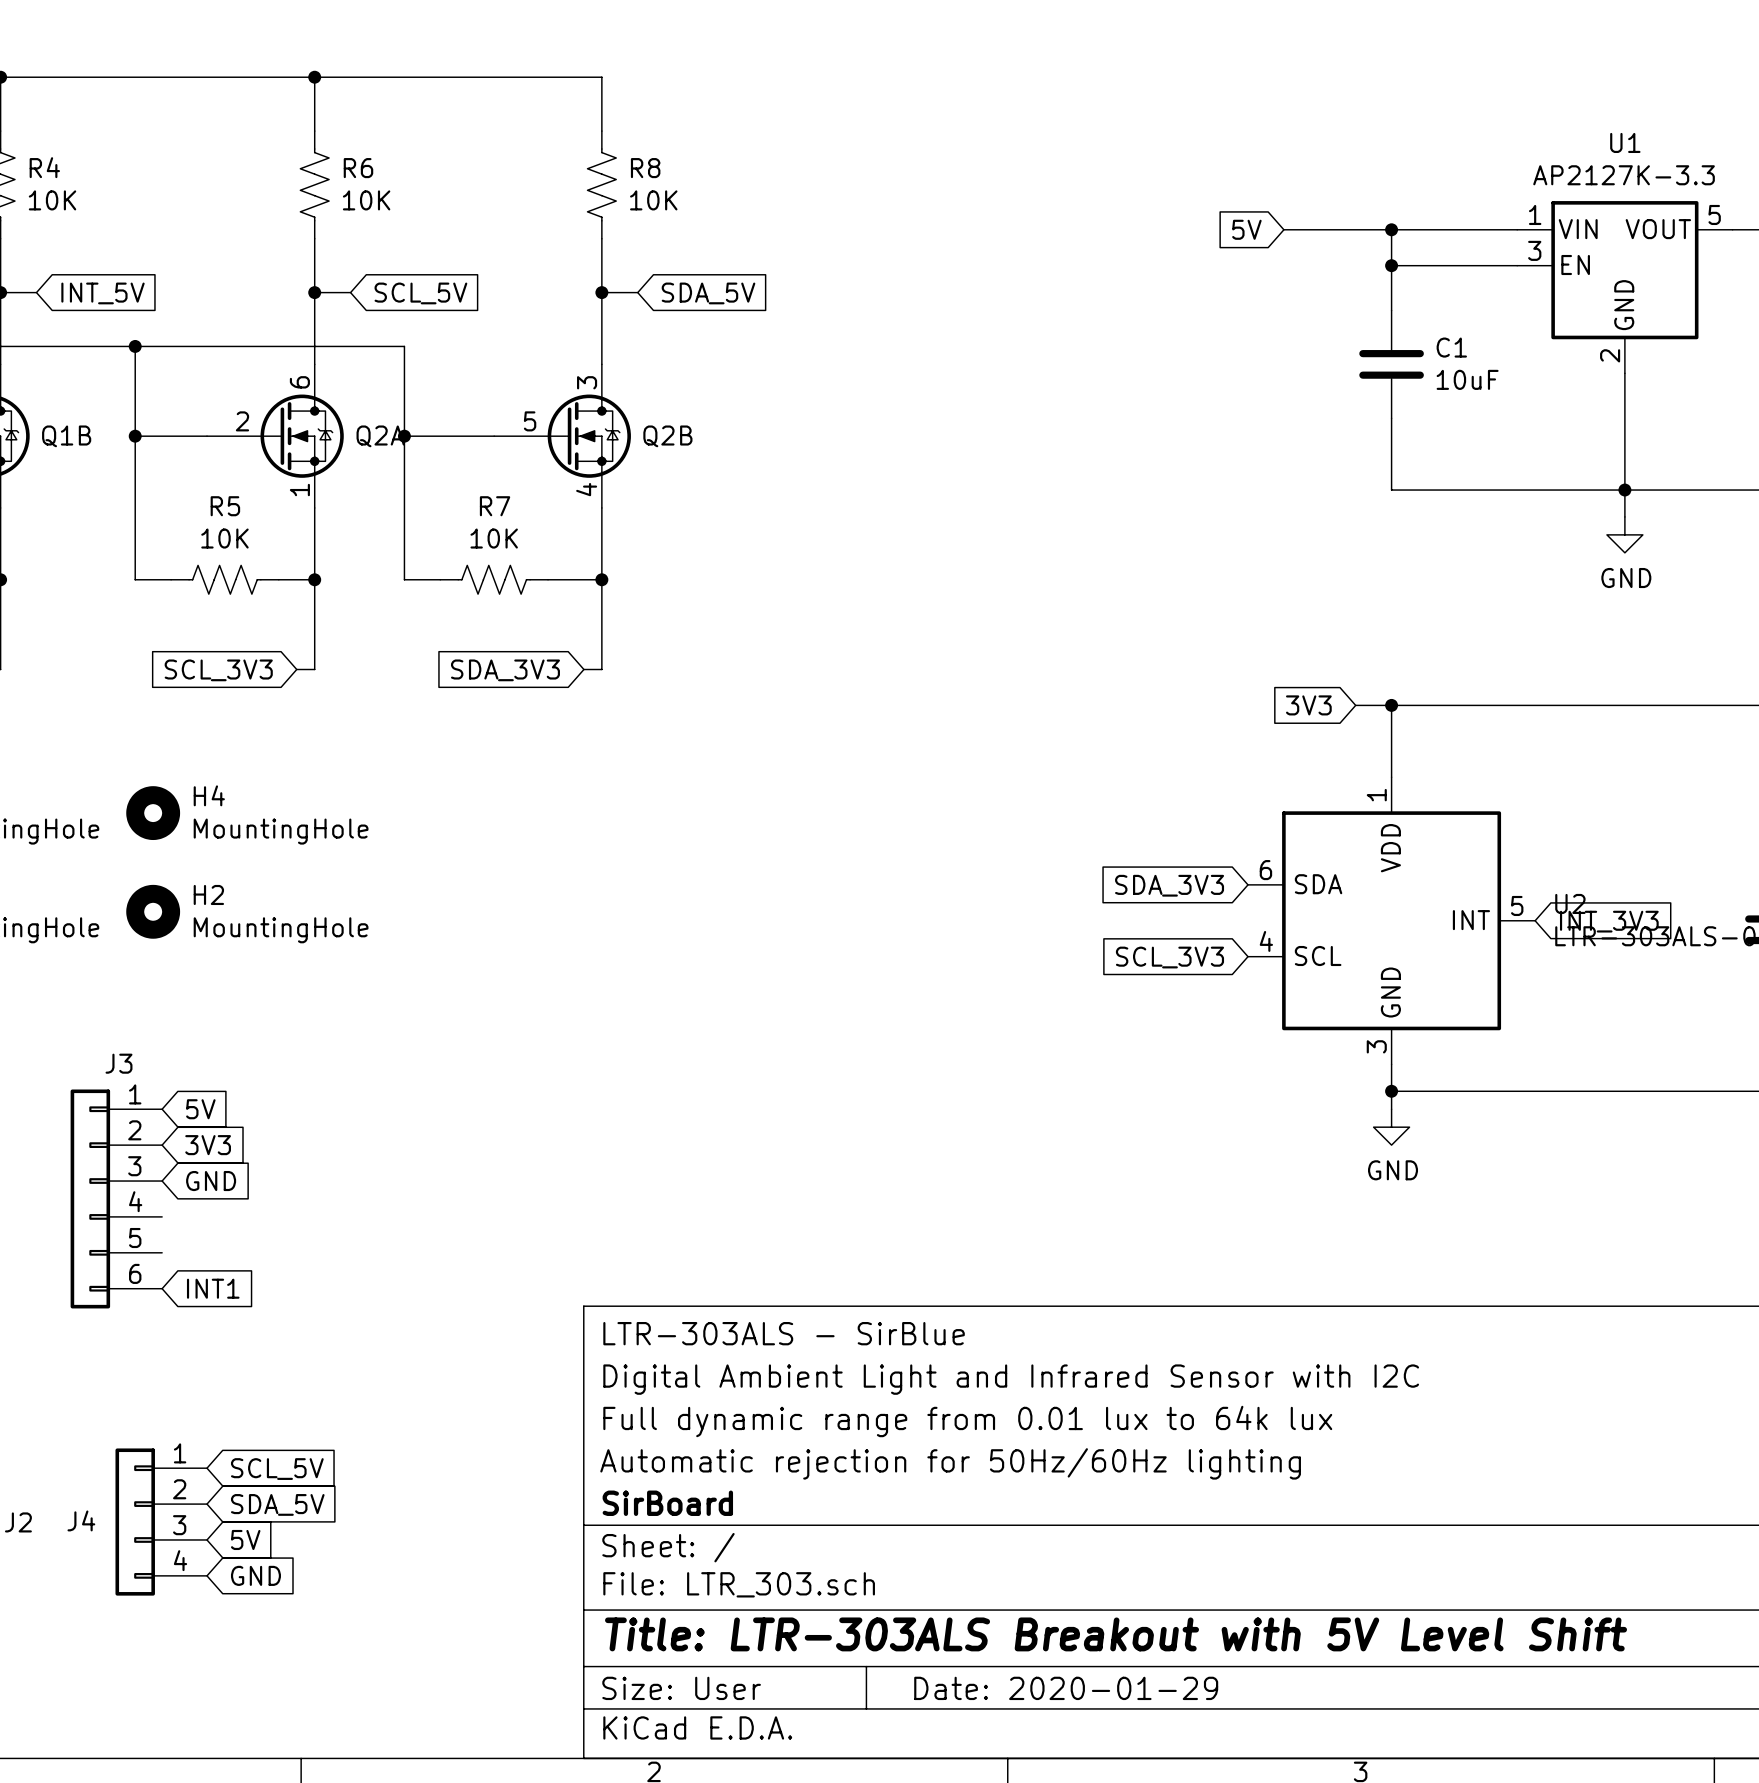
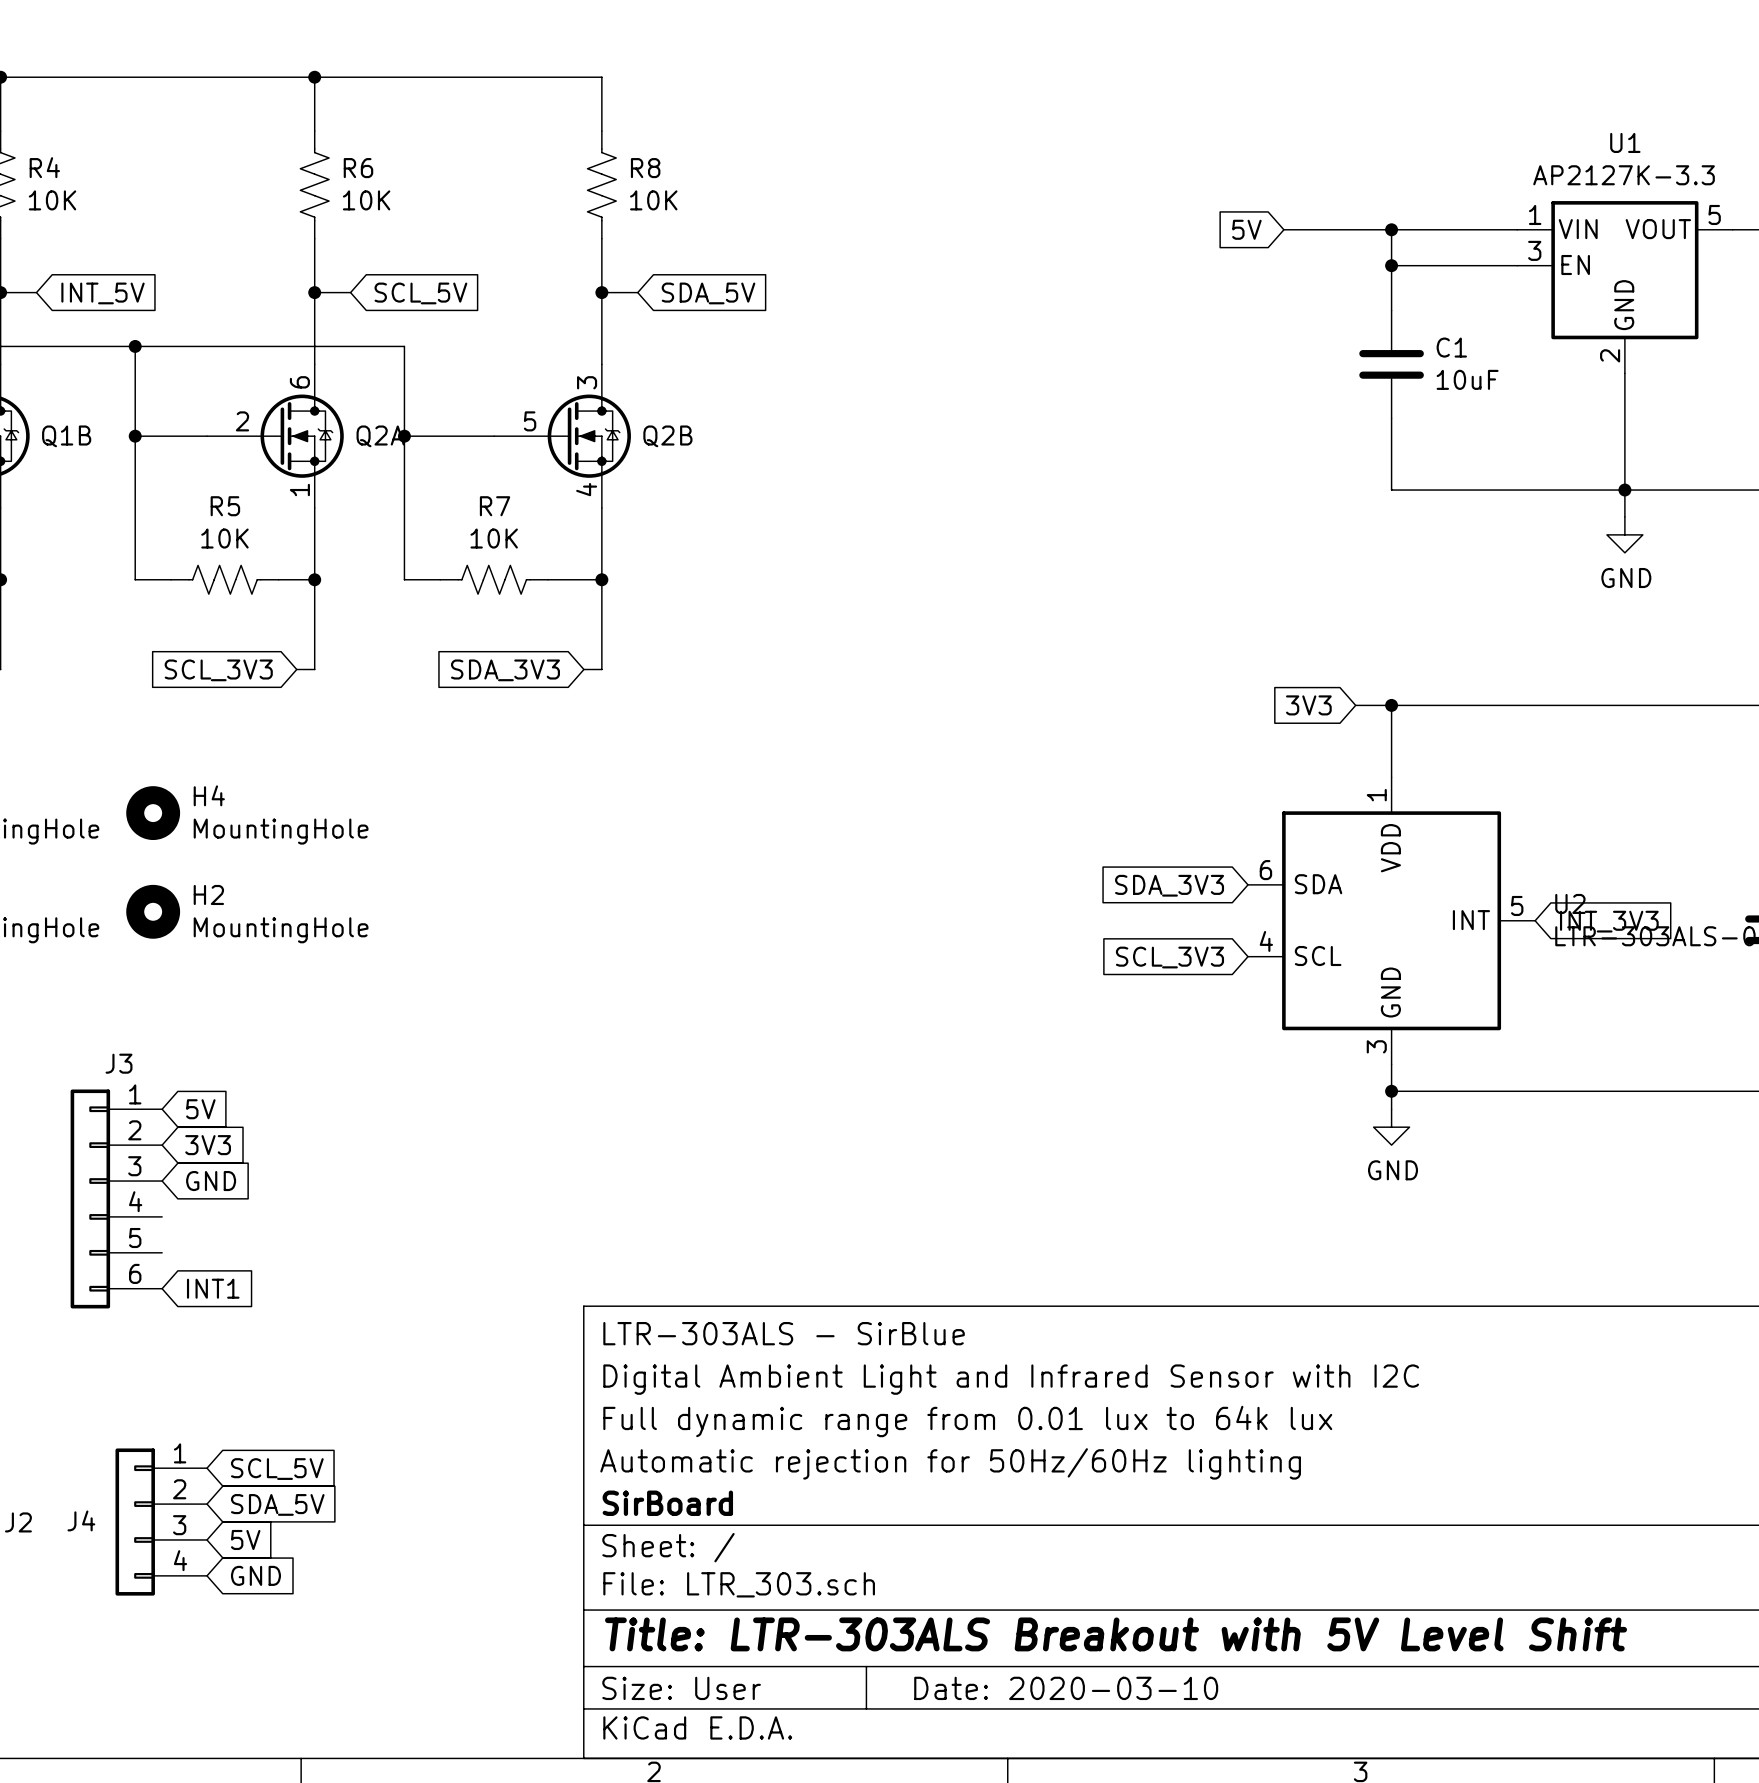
title block: Date: 2020-01-29 (1066, 1688) -> Date: 2020-03-10 (1066, 1688)

